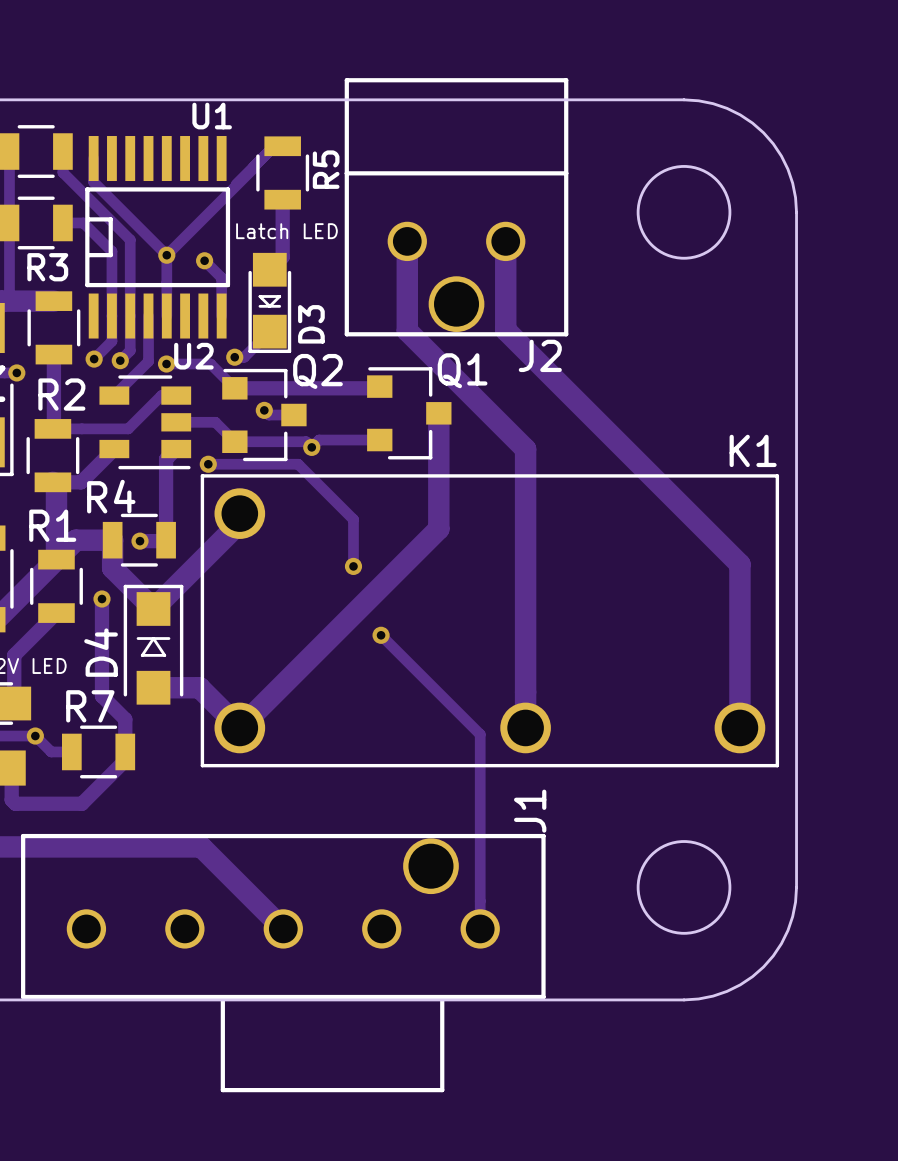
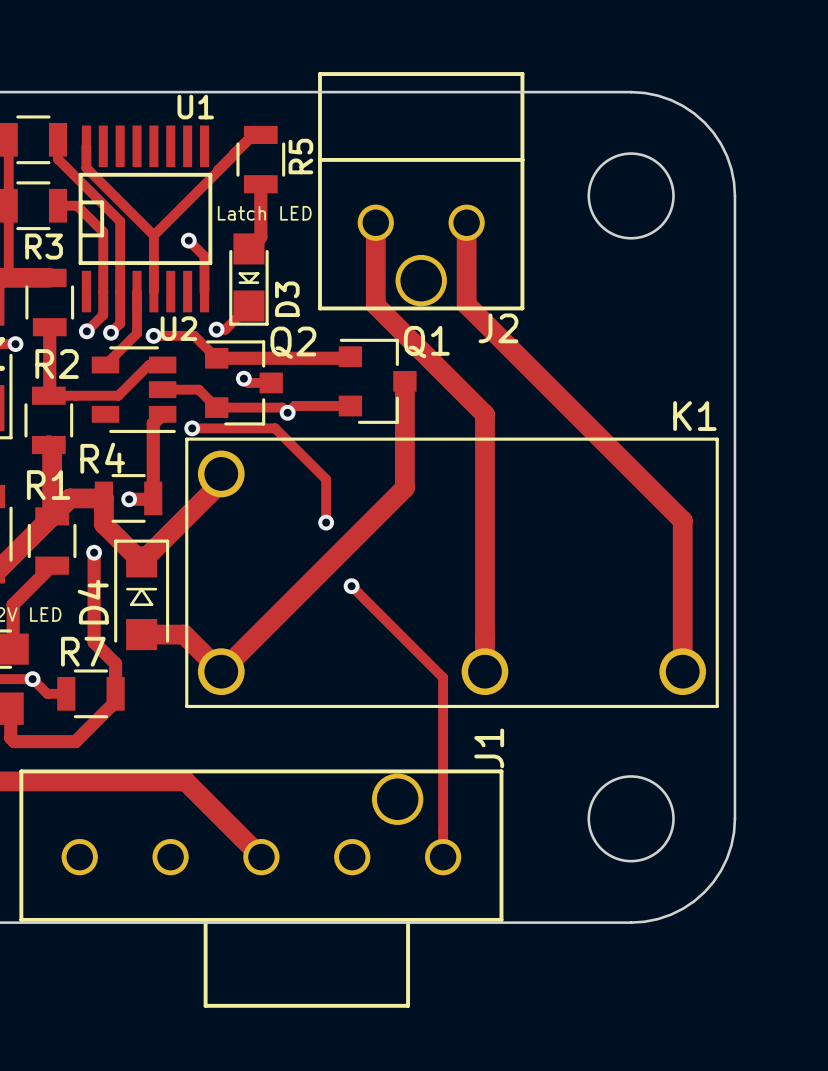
via: (166, 255) -> none
track: (114, 449) (81, 482) (52, 482) -> none

